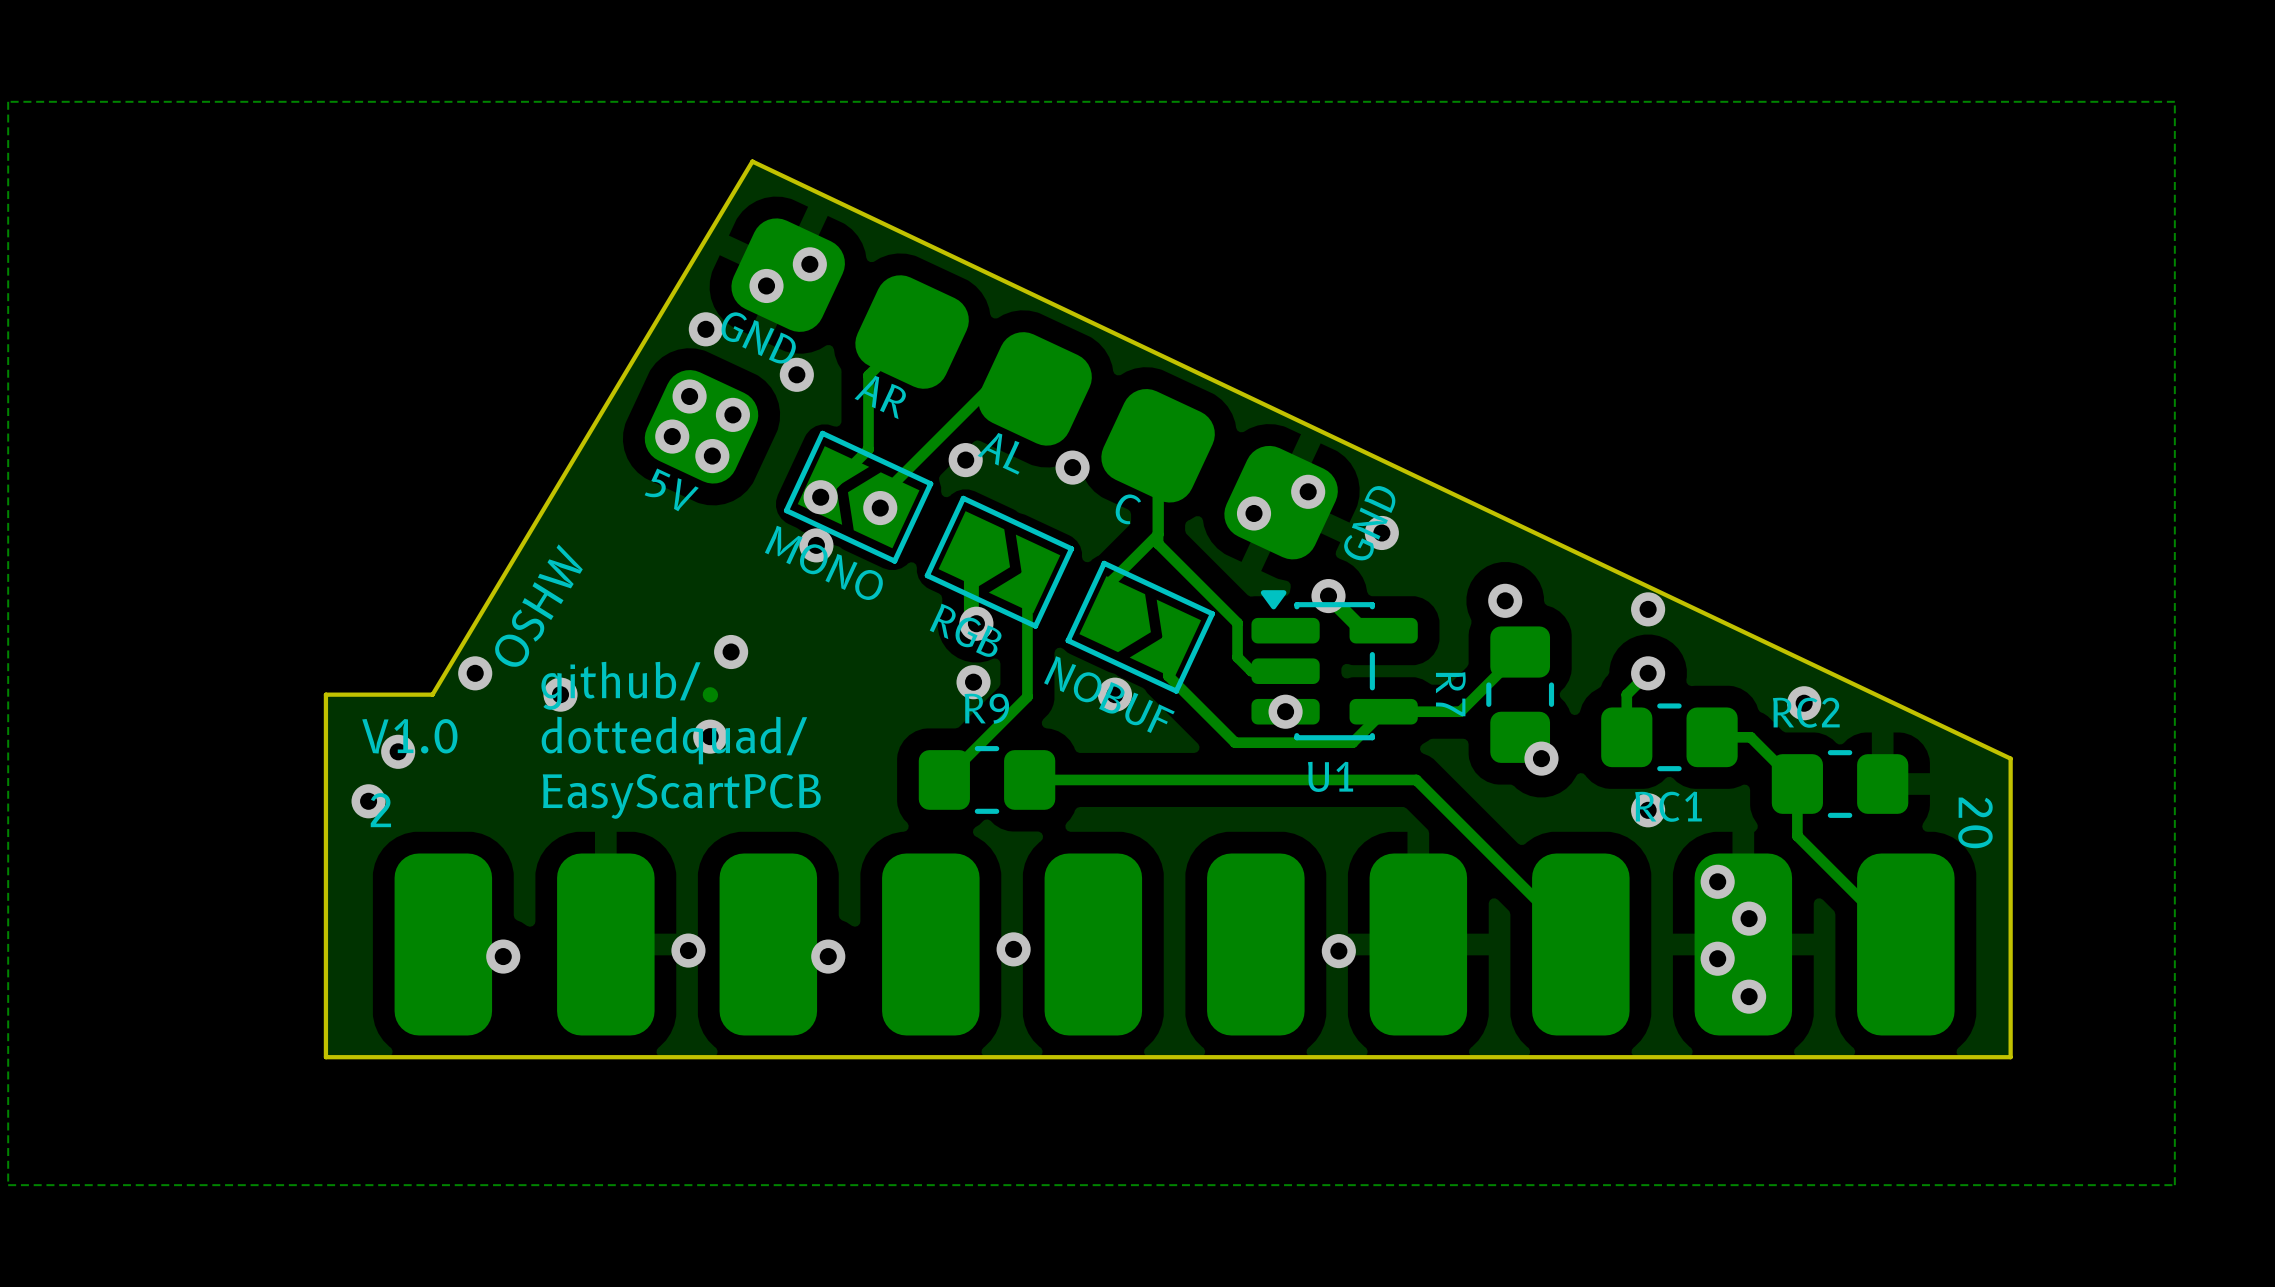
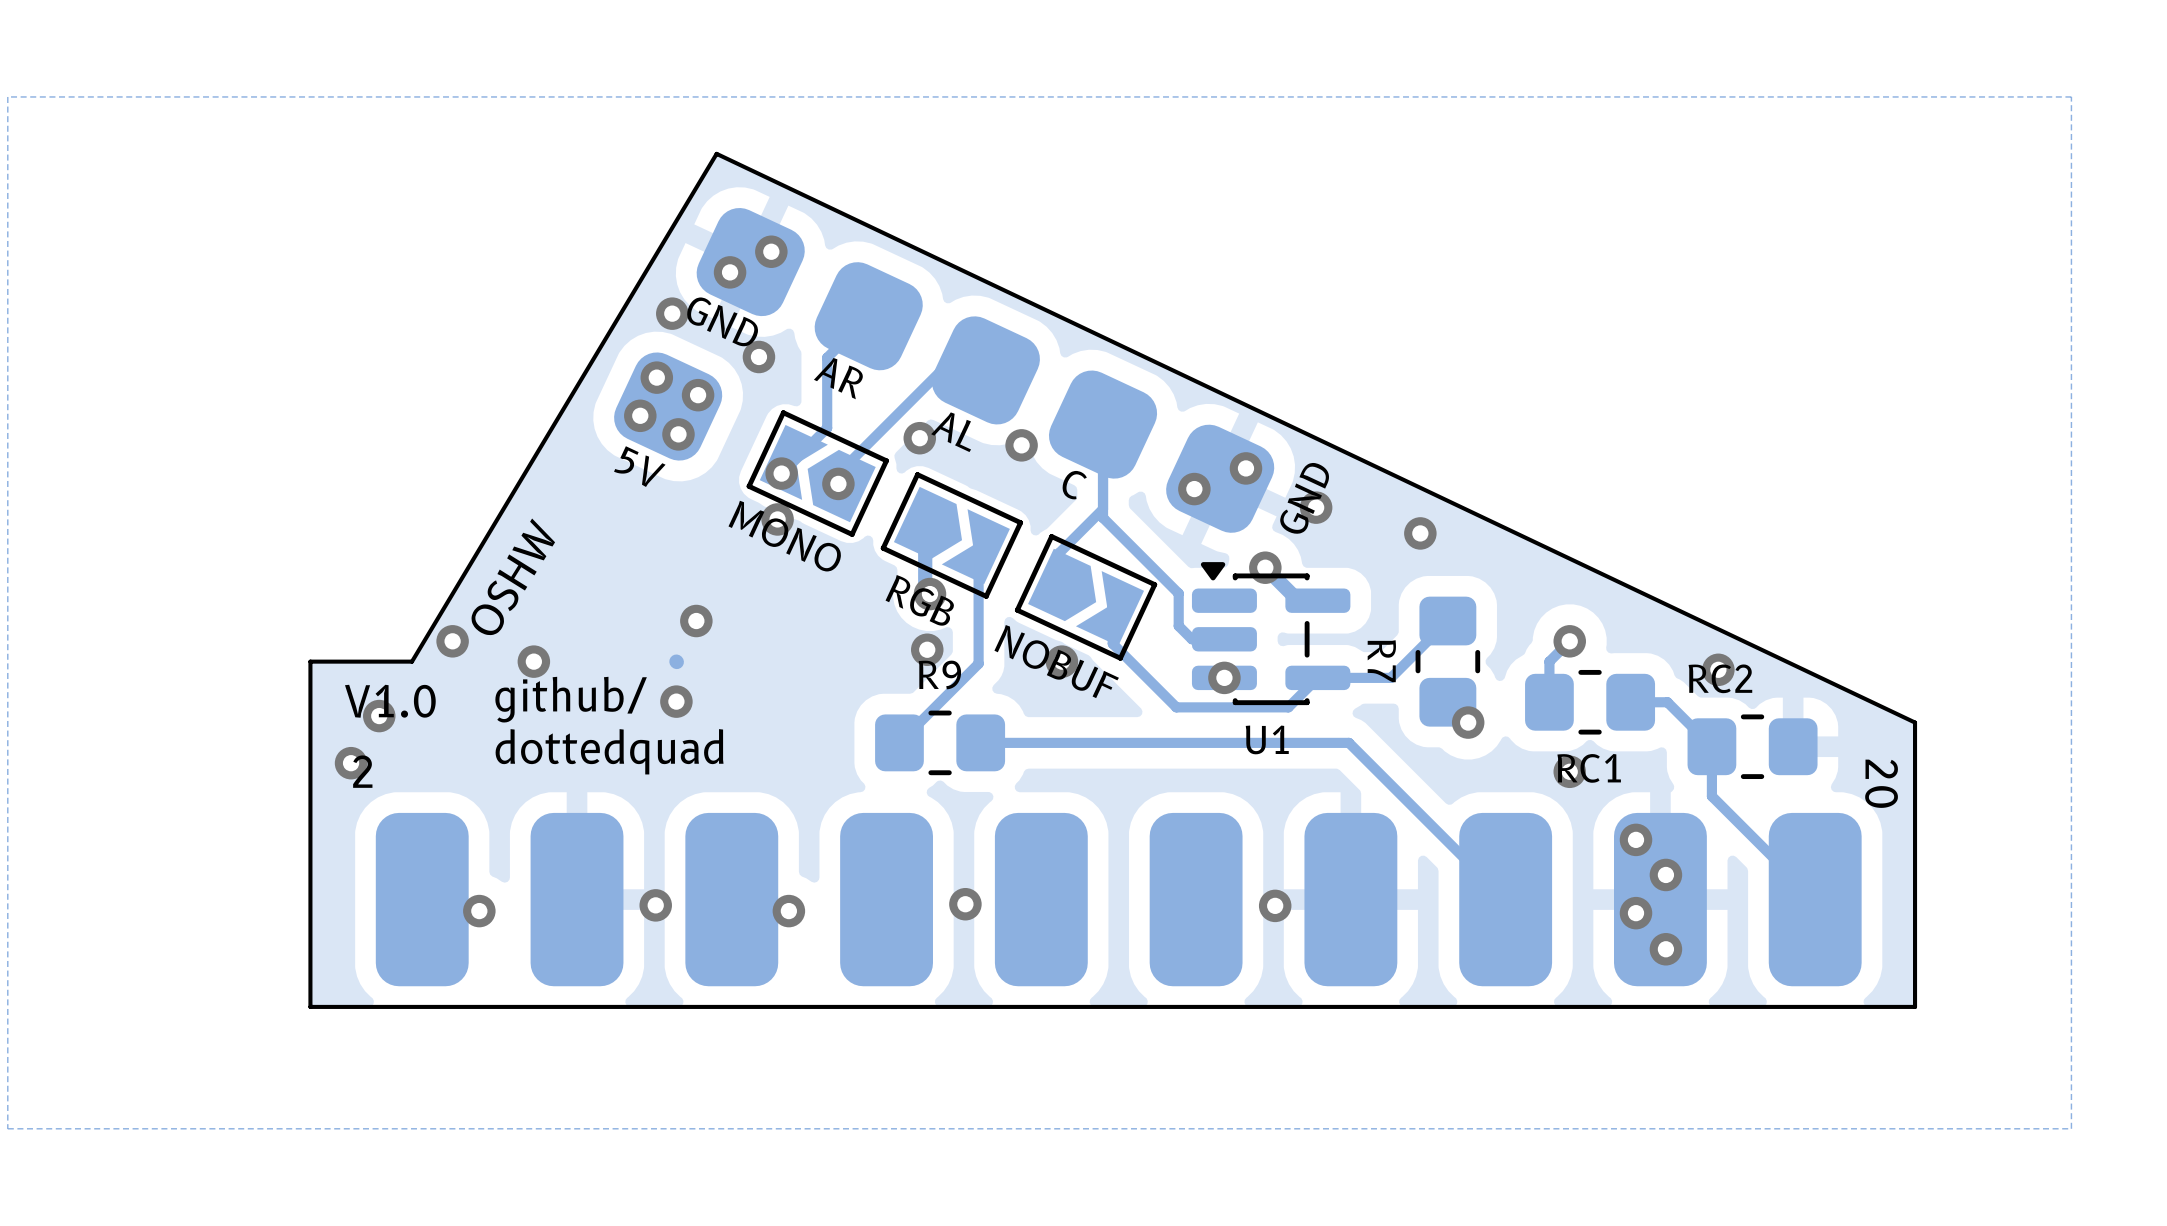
via position: (1505, 600) -> (1420, 533)
via: (1648, 609) -> none
text: github/ (620, 685) -> none
text: dottedquad/ (674, 740) -> github/ (571, 699)
text: EasyScartPCB (681, 796) -> dottedquad (609, 751)

